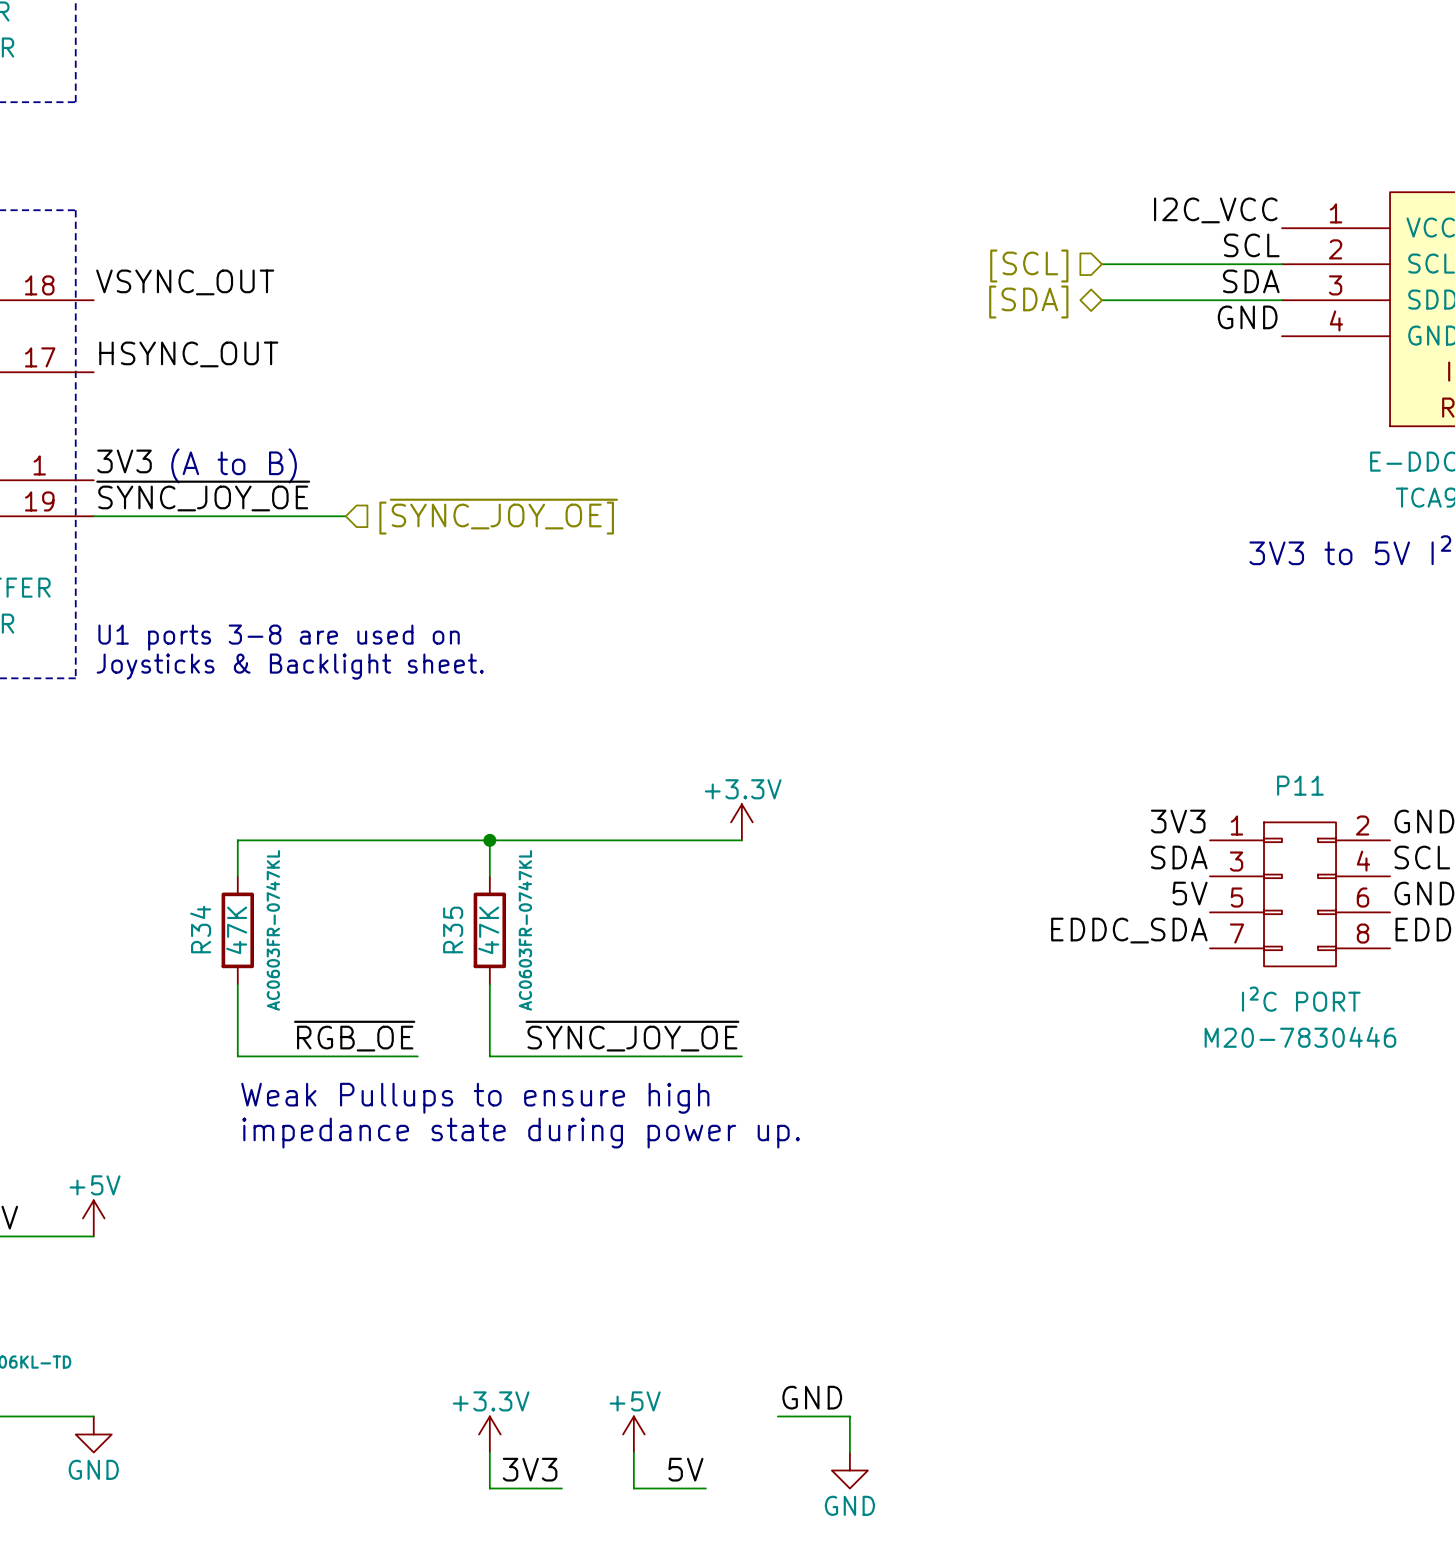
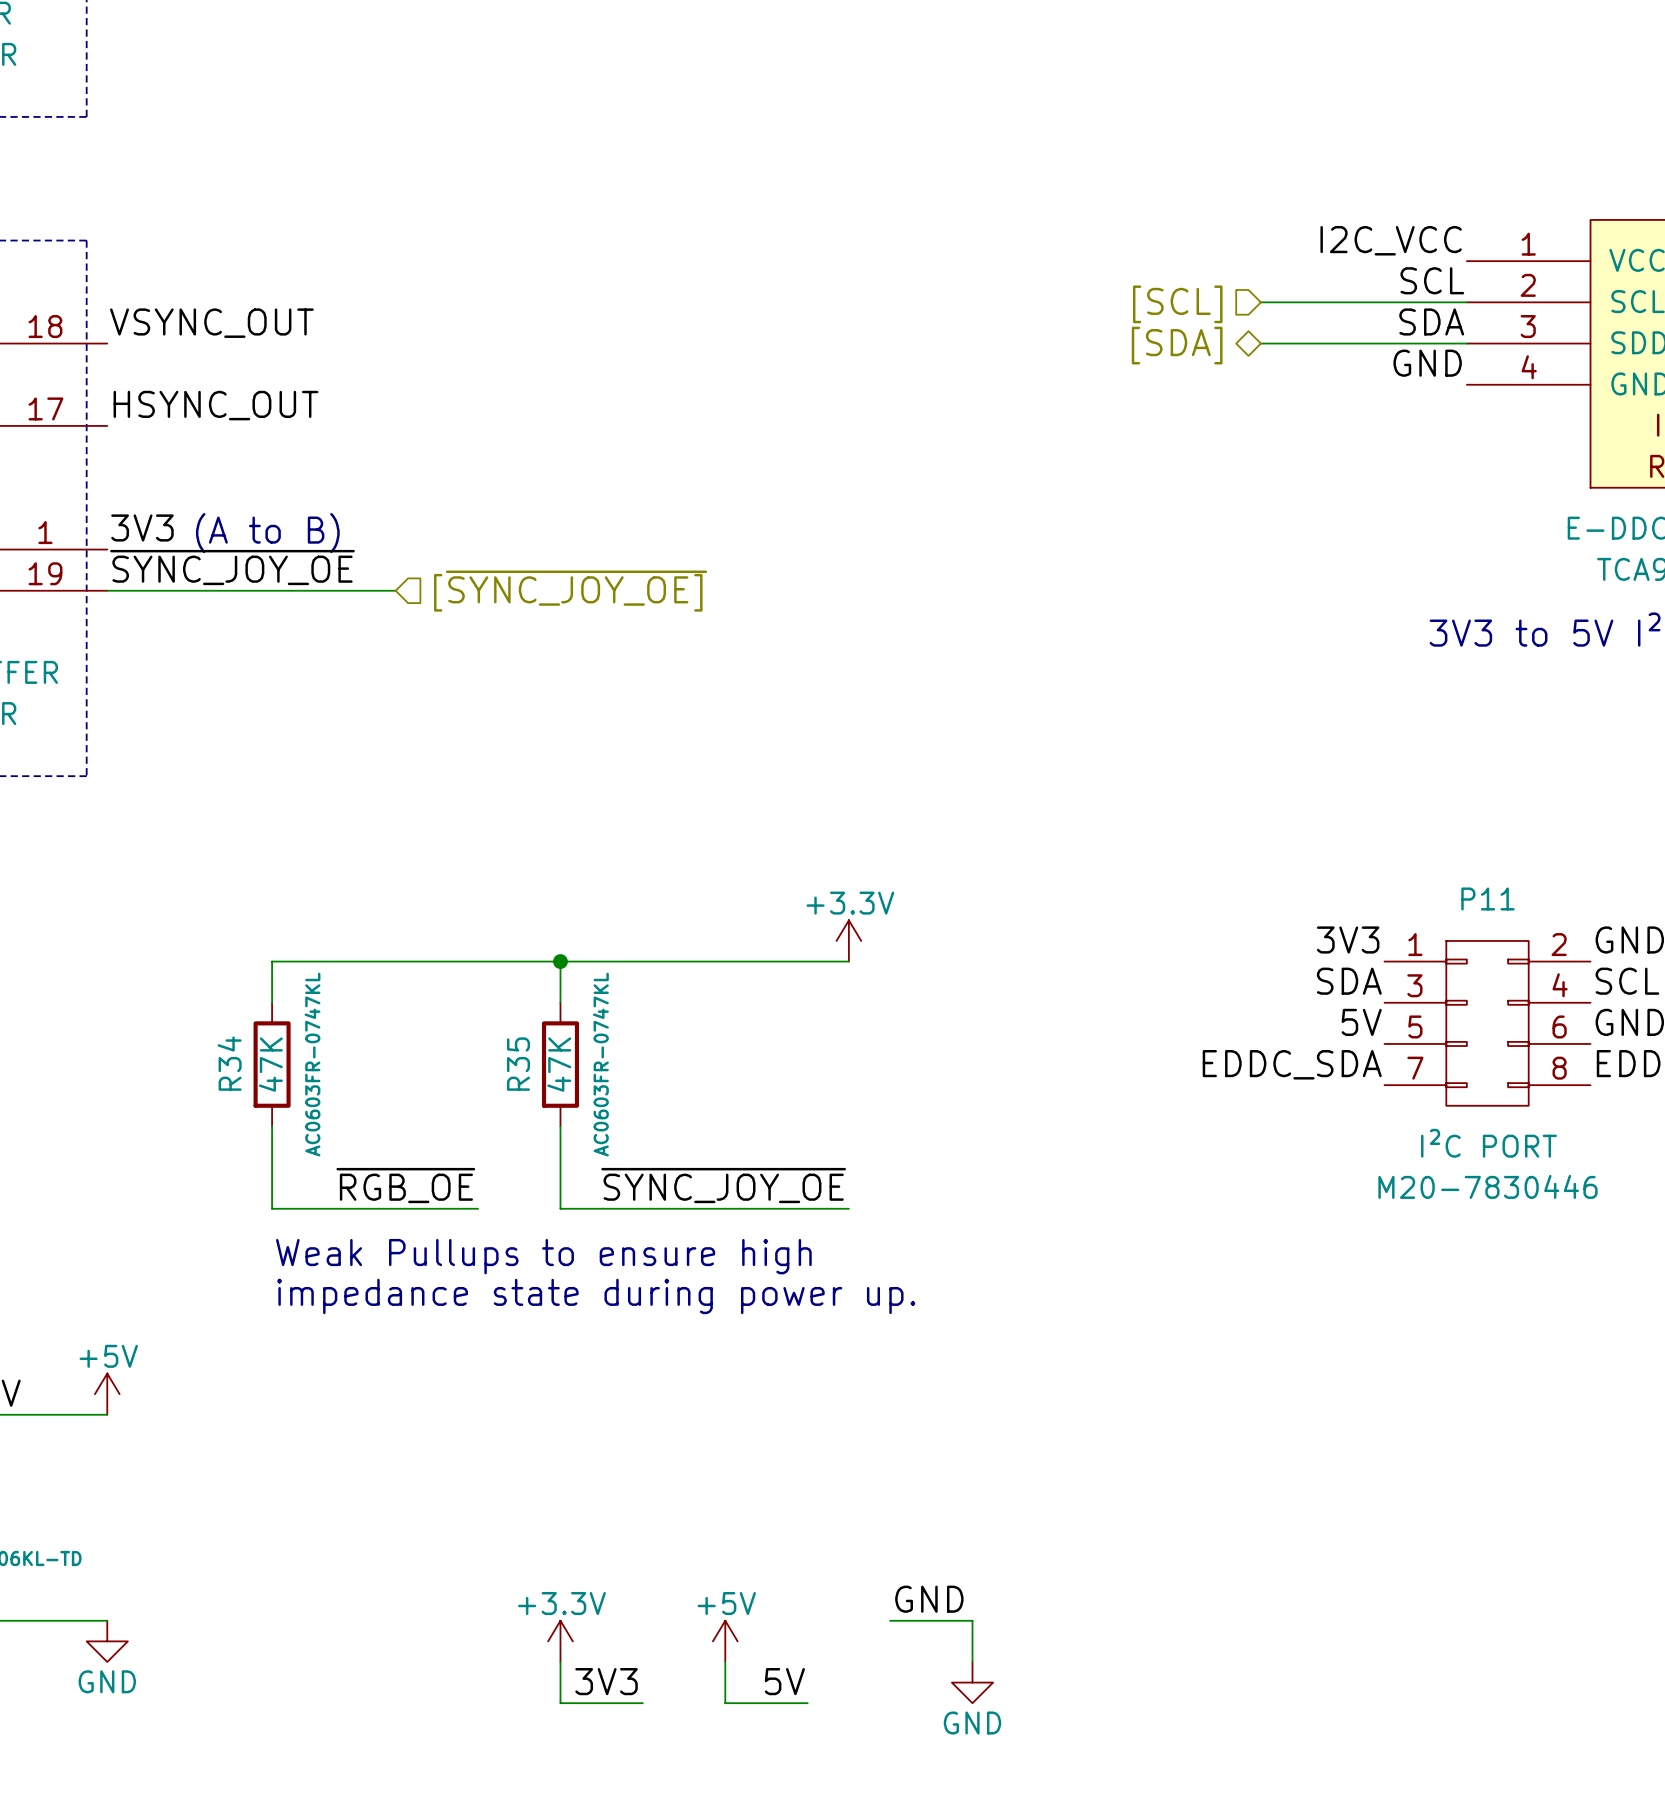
text: U1 ports 3-8 are used on (279, 637) -> none
text: Joysticks & Backlight sheet. (290, 666) -> none

